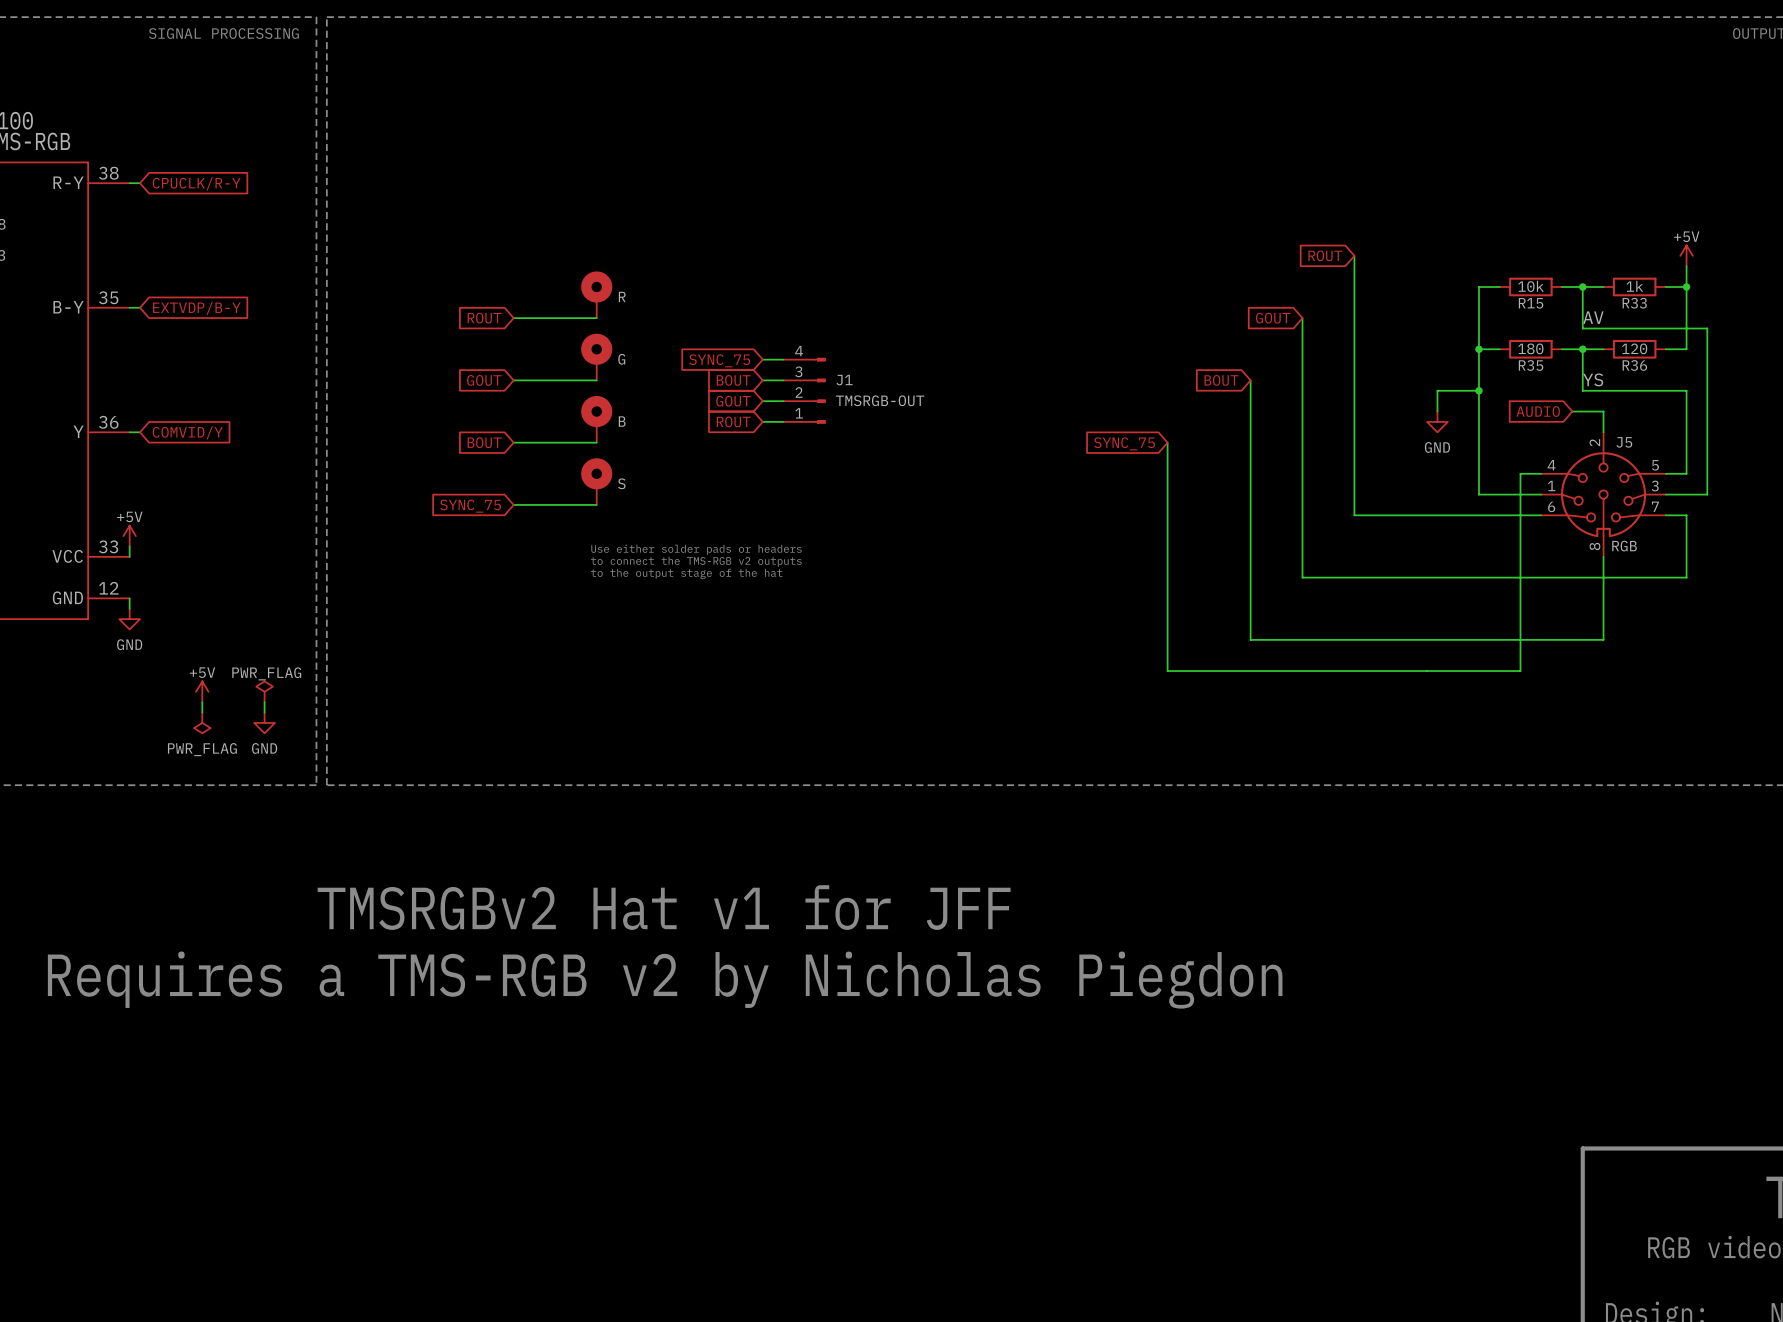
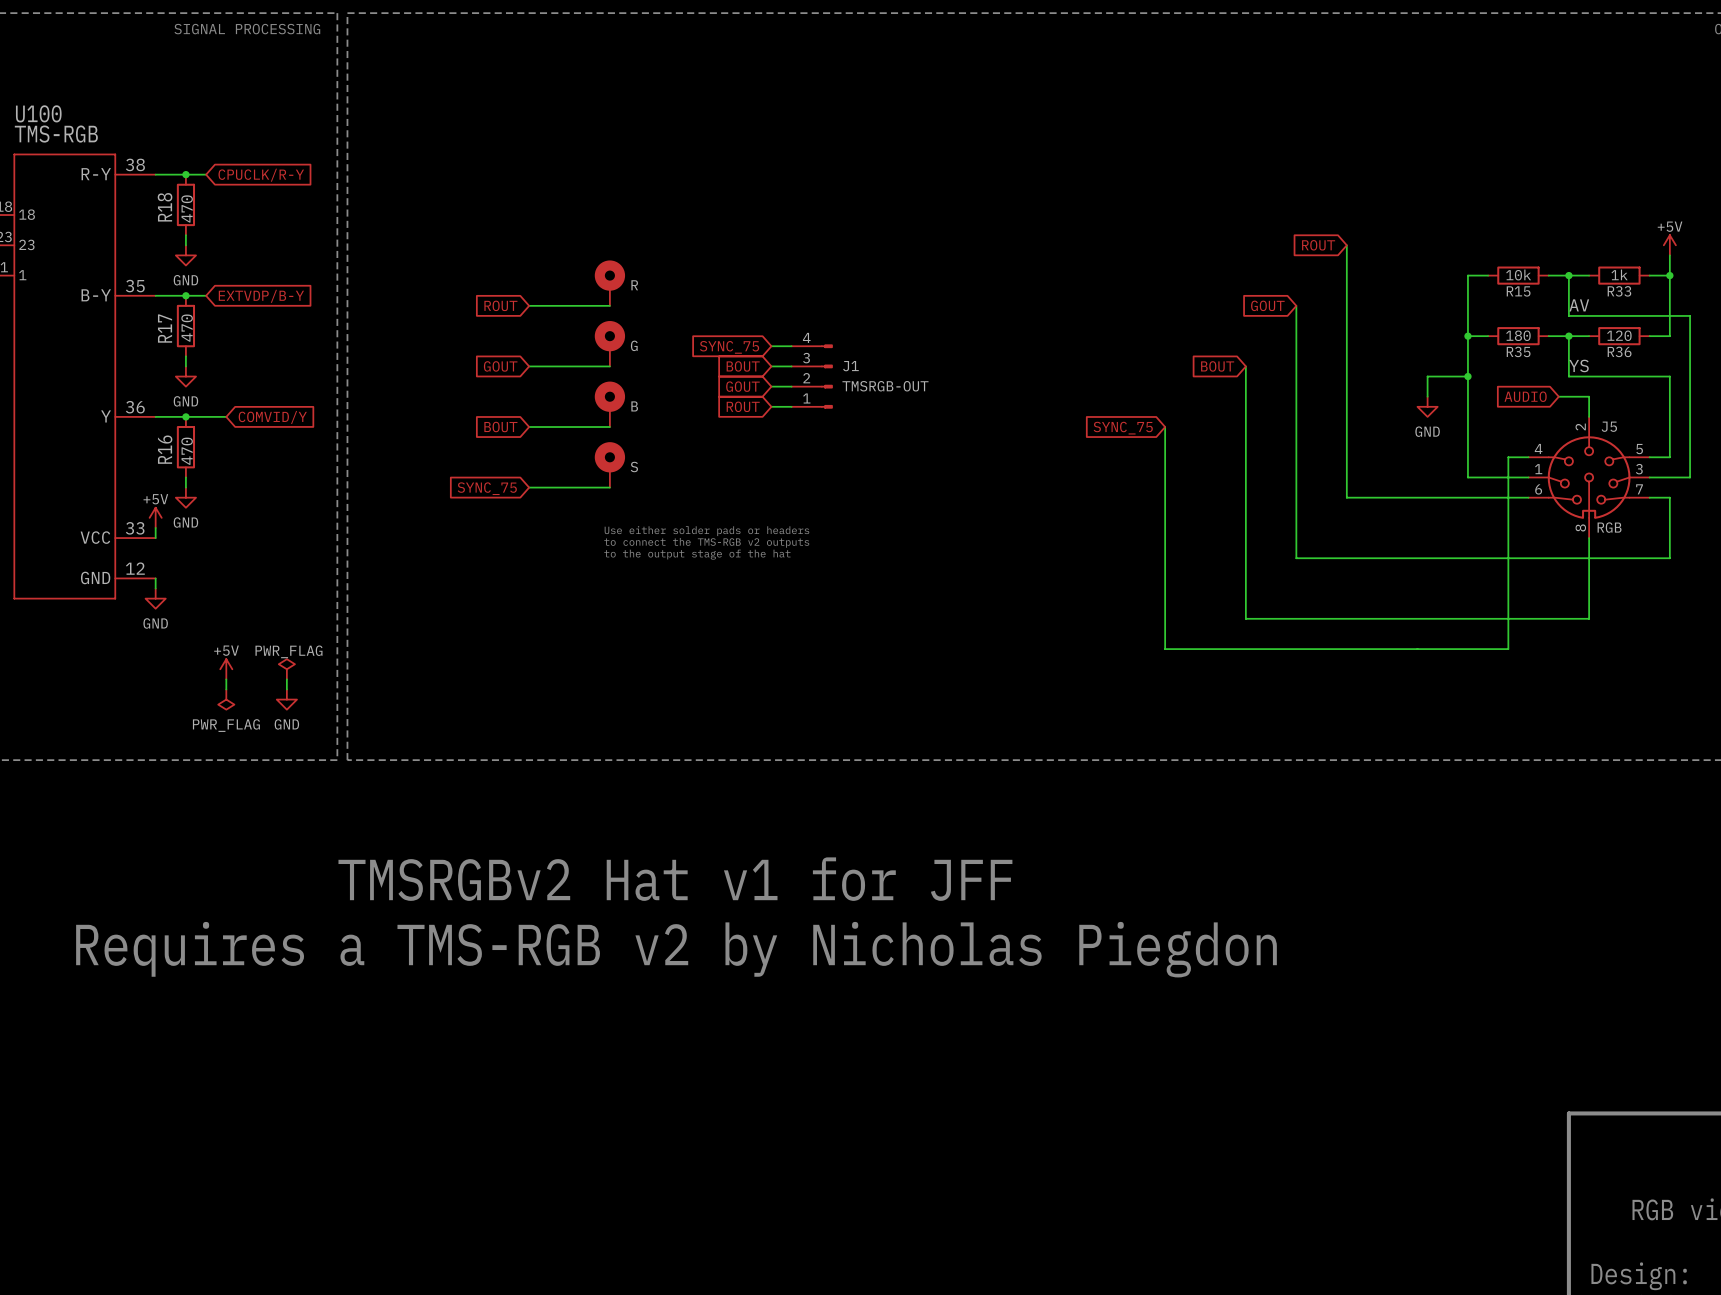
wire: none -> (165, 174) (206, 174)
junction: none -> (185, 174)
global label position: CPUCLK/R-Y (196, 183) -> CPUCLK/R-Y (261, 175)
R18: none -> 470 (185, 204)
wire: none -> (185, 235) (185, 245)
power symbol: none -> GND (185, 255)
wire: none -> (165, 295) (206, 295)
junction: none -> (185, 295)
global label position: EXTVDP/B-Y (196, 308) -> EXTVDP/B-Y (261, 296)
R17: none -> 470 (185, 326)
wire: none -> (185, 356) (185, 366)
power symbol: none -> GND (185, 376)
wire: none -> (165, 416) (226, 416)
junction: none -> (185, 416)
global label position: COMVID/Y (187, 432) -> COMVID/Y (272, 417)
R16: none -> 470 (185, 447)
wire: none -> (185, 477) (185, 487)
power symbol: none -> GND (185, 497)

